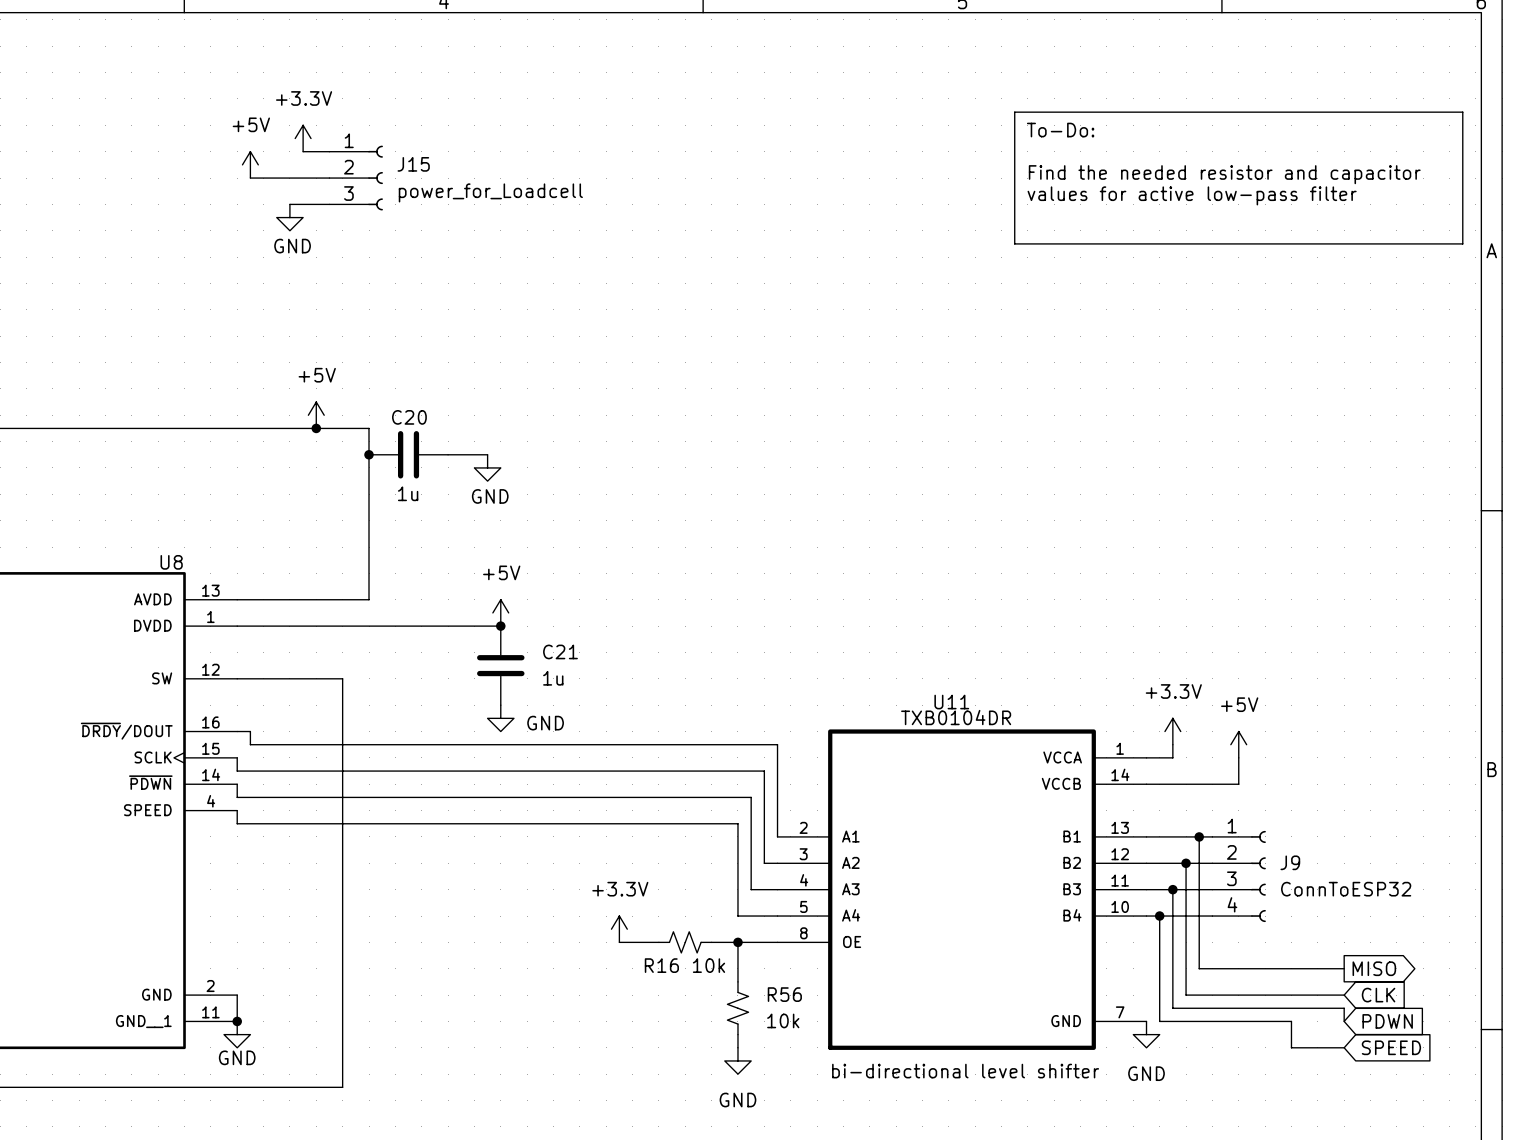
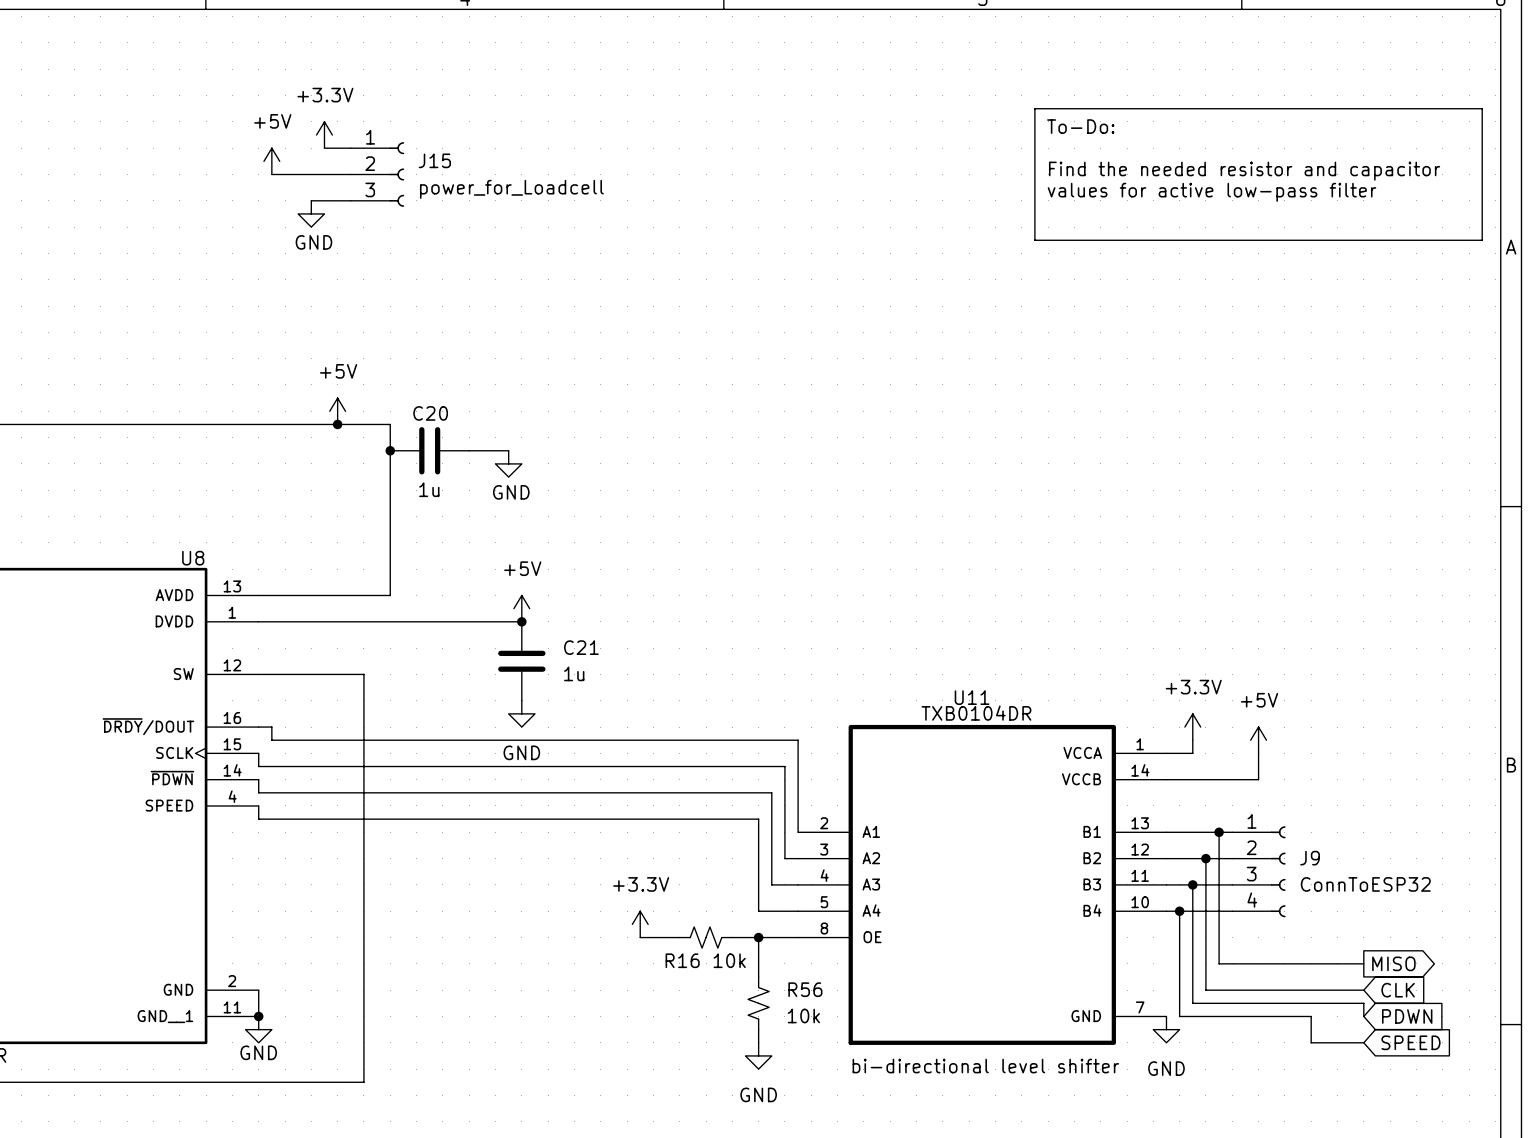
power symbol text position: GND (545, 723) -> GND (521, 752)

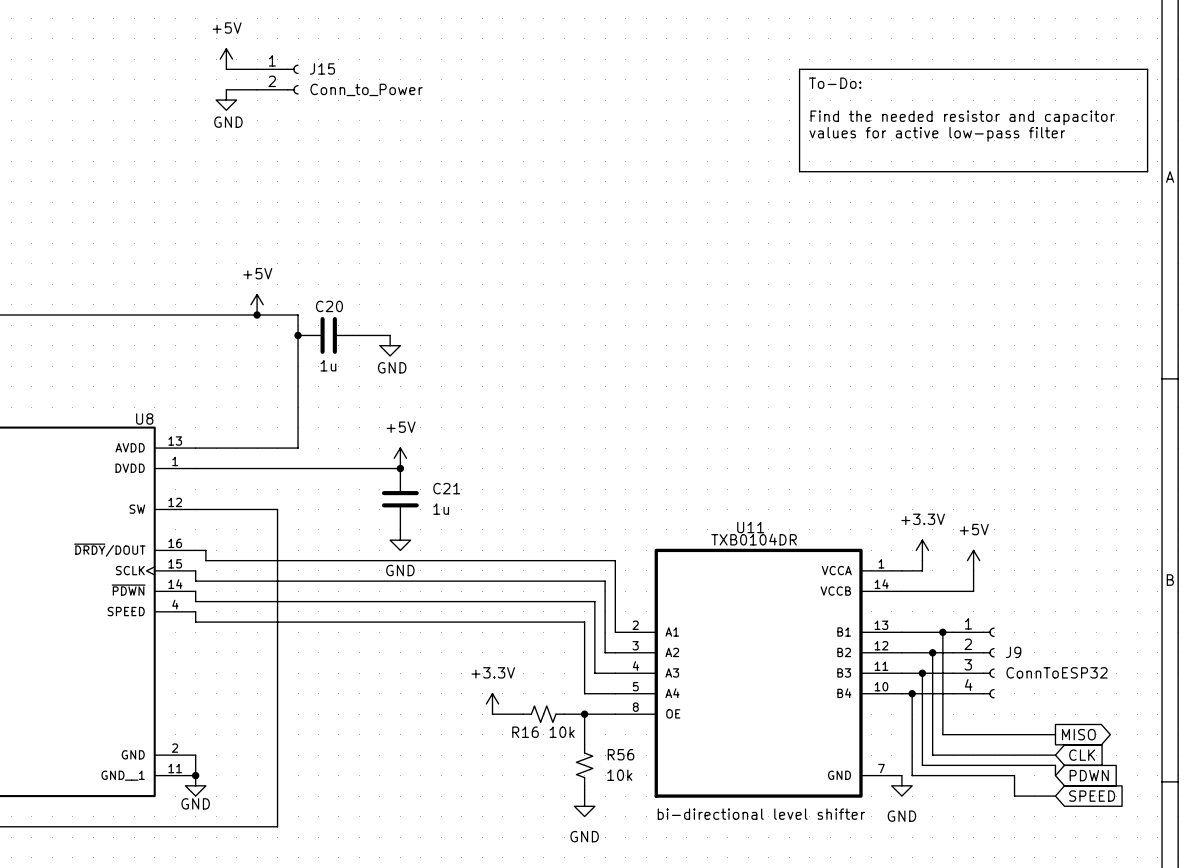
wire: none -> (226, 69) (257, 69)
power symbol: +3.3V (324, 135) -> none
J15 symbol: [350, 142, 405, 207] -> [257, 64, 299, 95]
wire: (324, 148) (350, 148) -> none
power symbol position: +5V (271, 161) -> +5V (226, 59)
wire: (271, 174) (350, 174) -> none
J15 value: power_for_Loadcell (511, 189) -> Conn_to_Power (366, 89)
wire: (311, 200) (350, 200) -> (226, 89) (257, 89)
power symbol position: GND (311, 213) -> GND (226, 100)

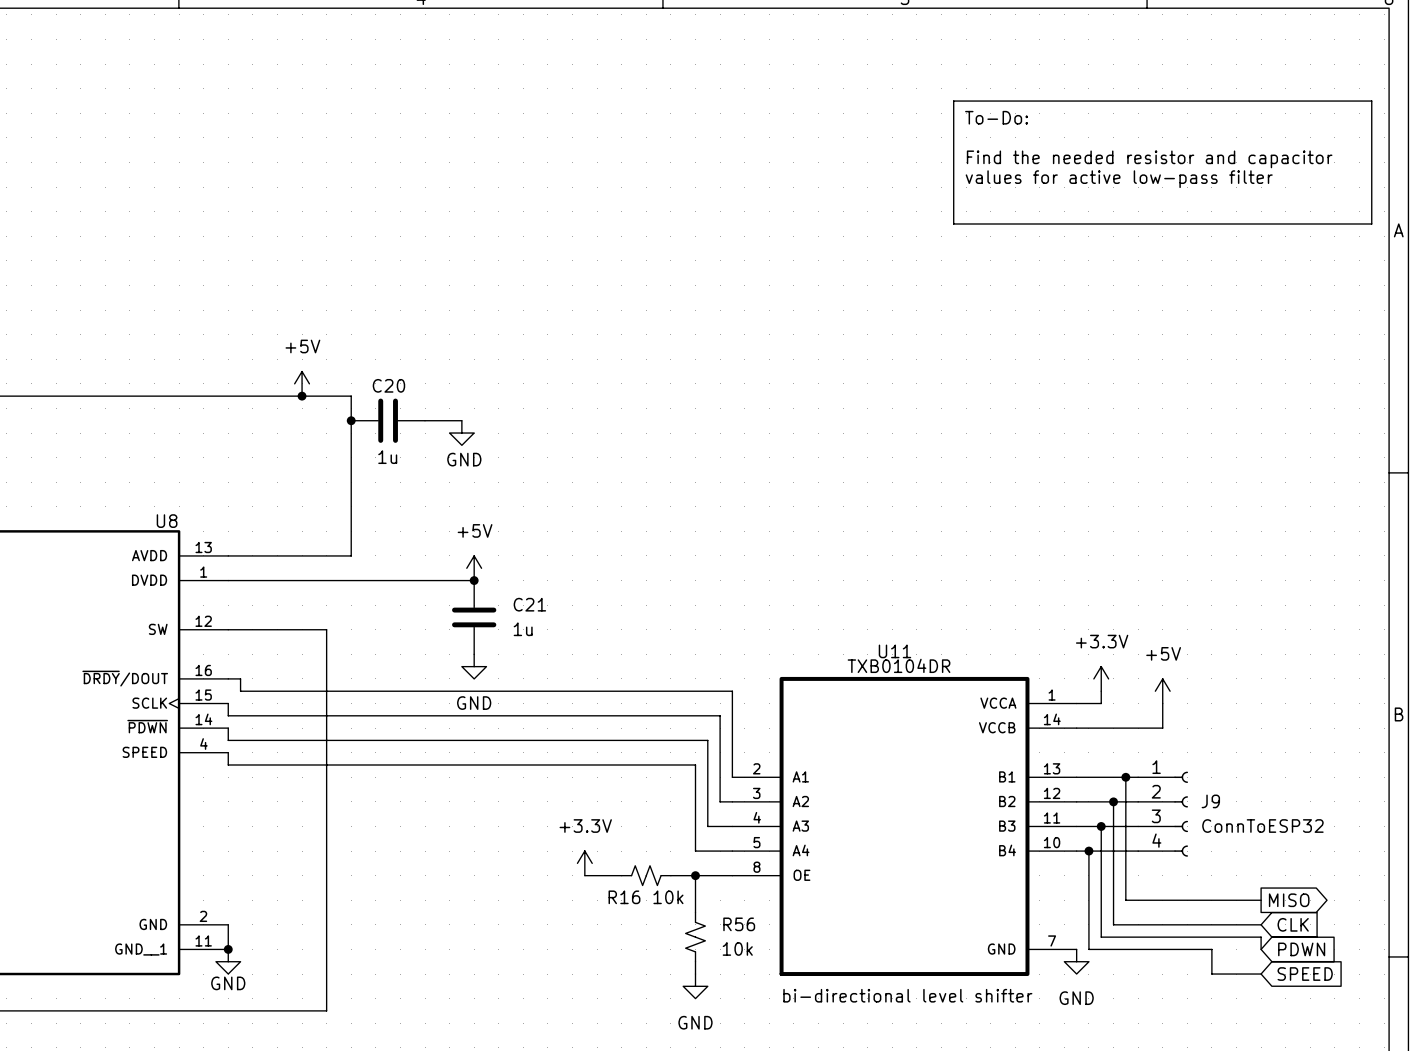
power symbol: +5V (226, 59) -> none
wire: (226, 69) (257, 69) -> none
J15: Conn_to_Power (277, 79) -> none
wire: (226, 89) (257, 89) -> none
power symbol: GND (226, 100) -> none

